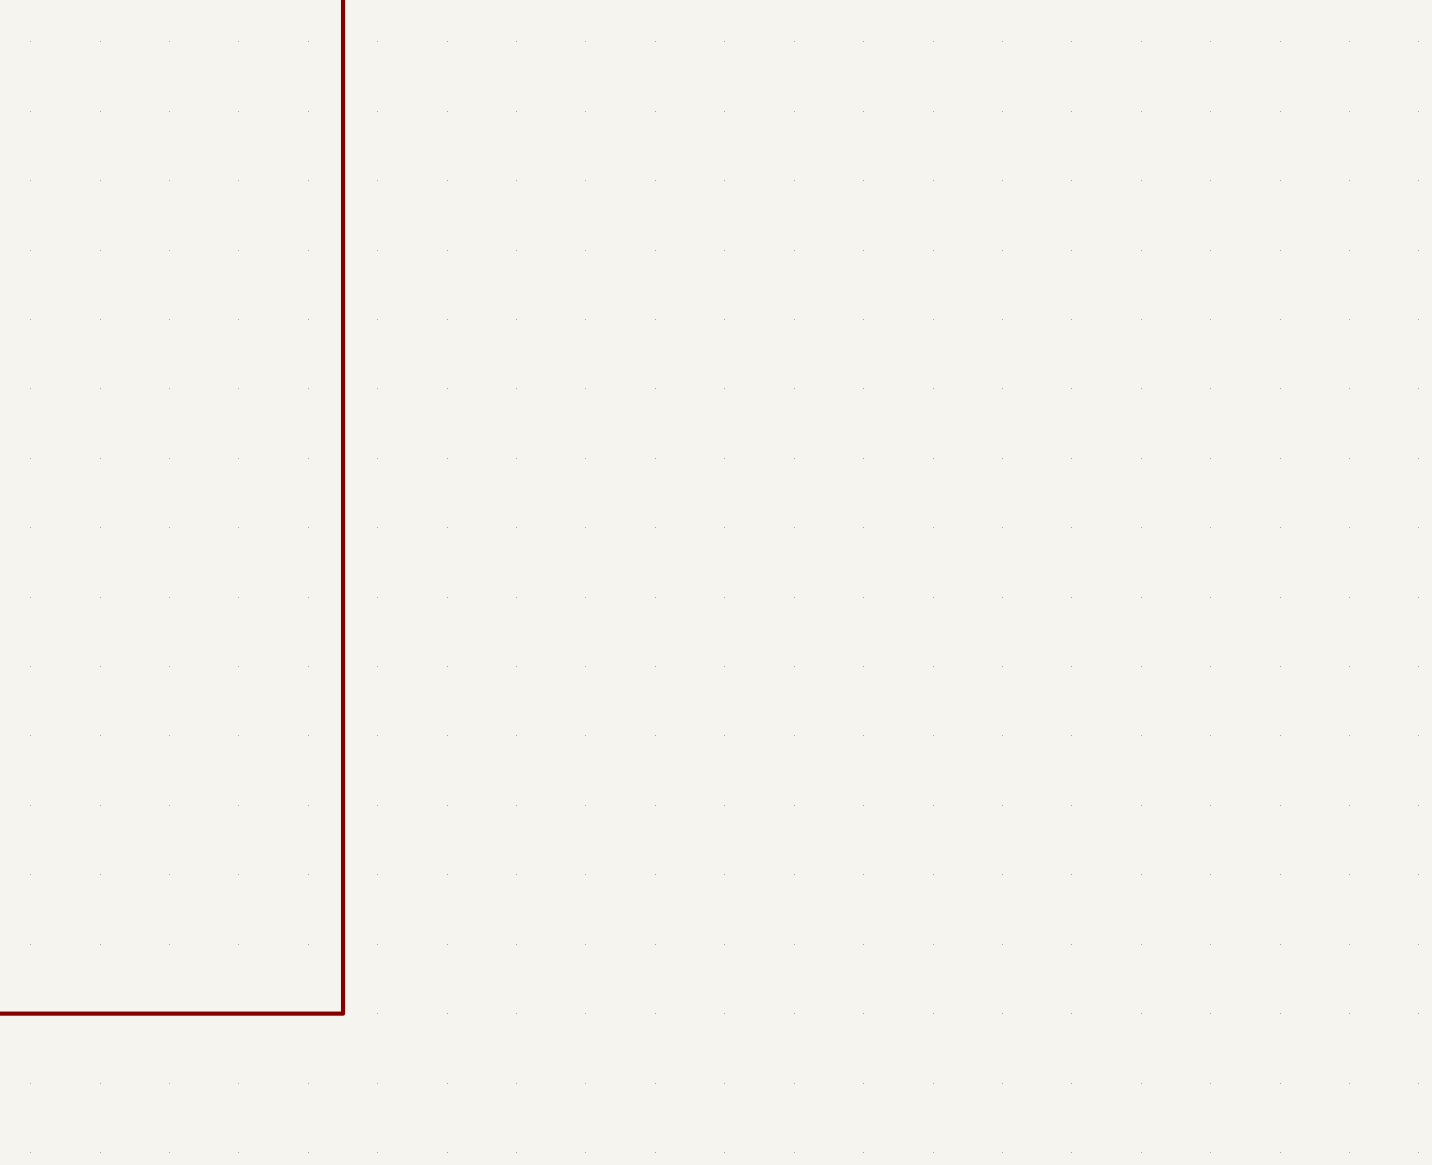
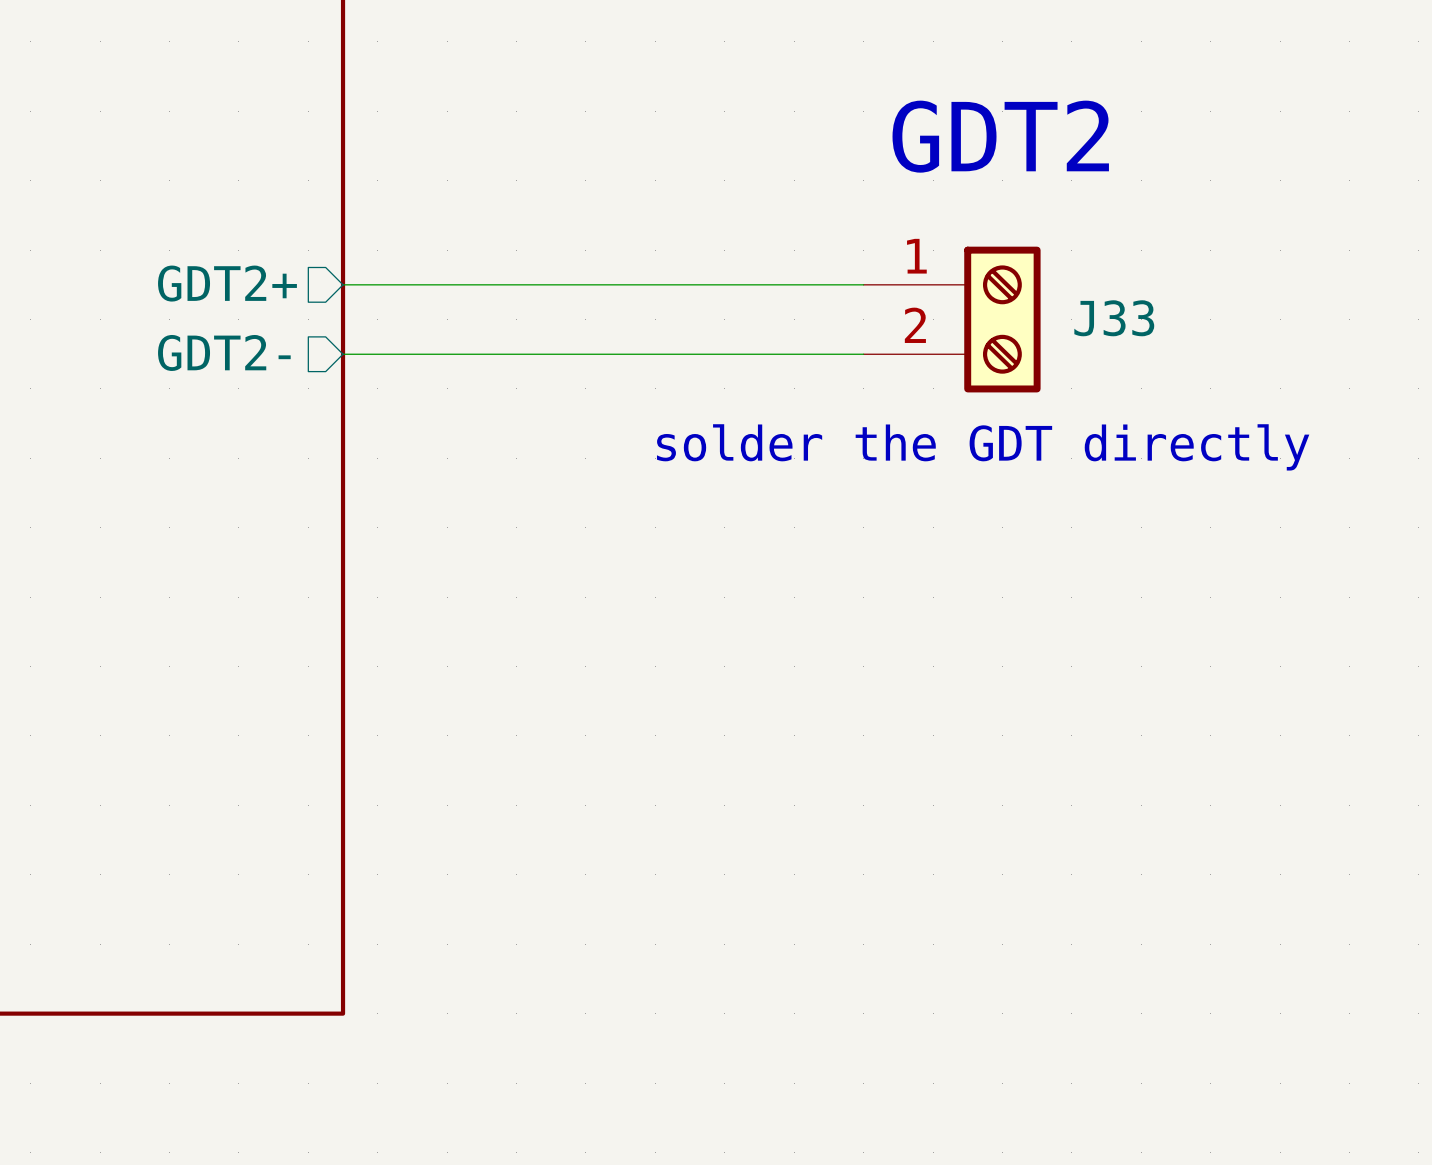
text: none -> GDT2 (1000, 136)
sheet pin: none -> GDT2+ (227, 283)
wire: none -> (343, 284) (863, 284)
J33: none -> (952, 319)
sheet pin: none -> GDT2- (224, 352)
wire: none -> (343, 354) (863, 354)
text: none -> solder the GDT directly (983, 447)

